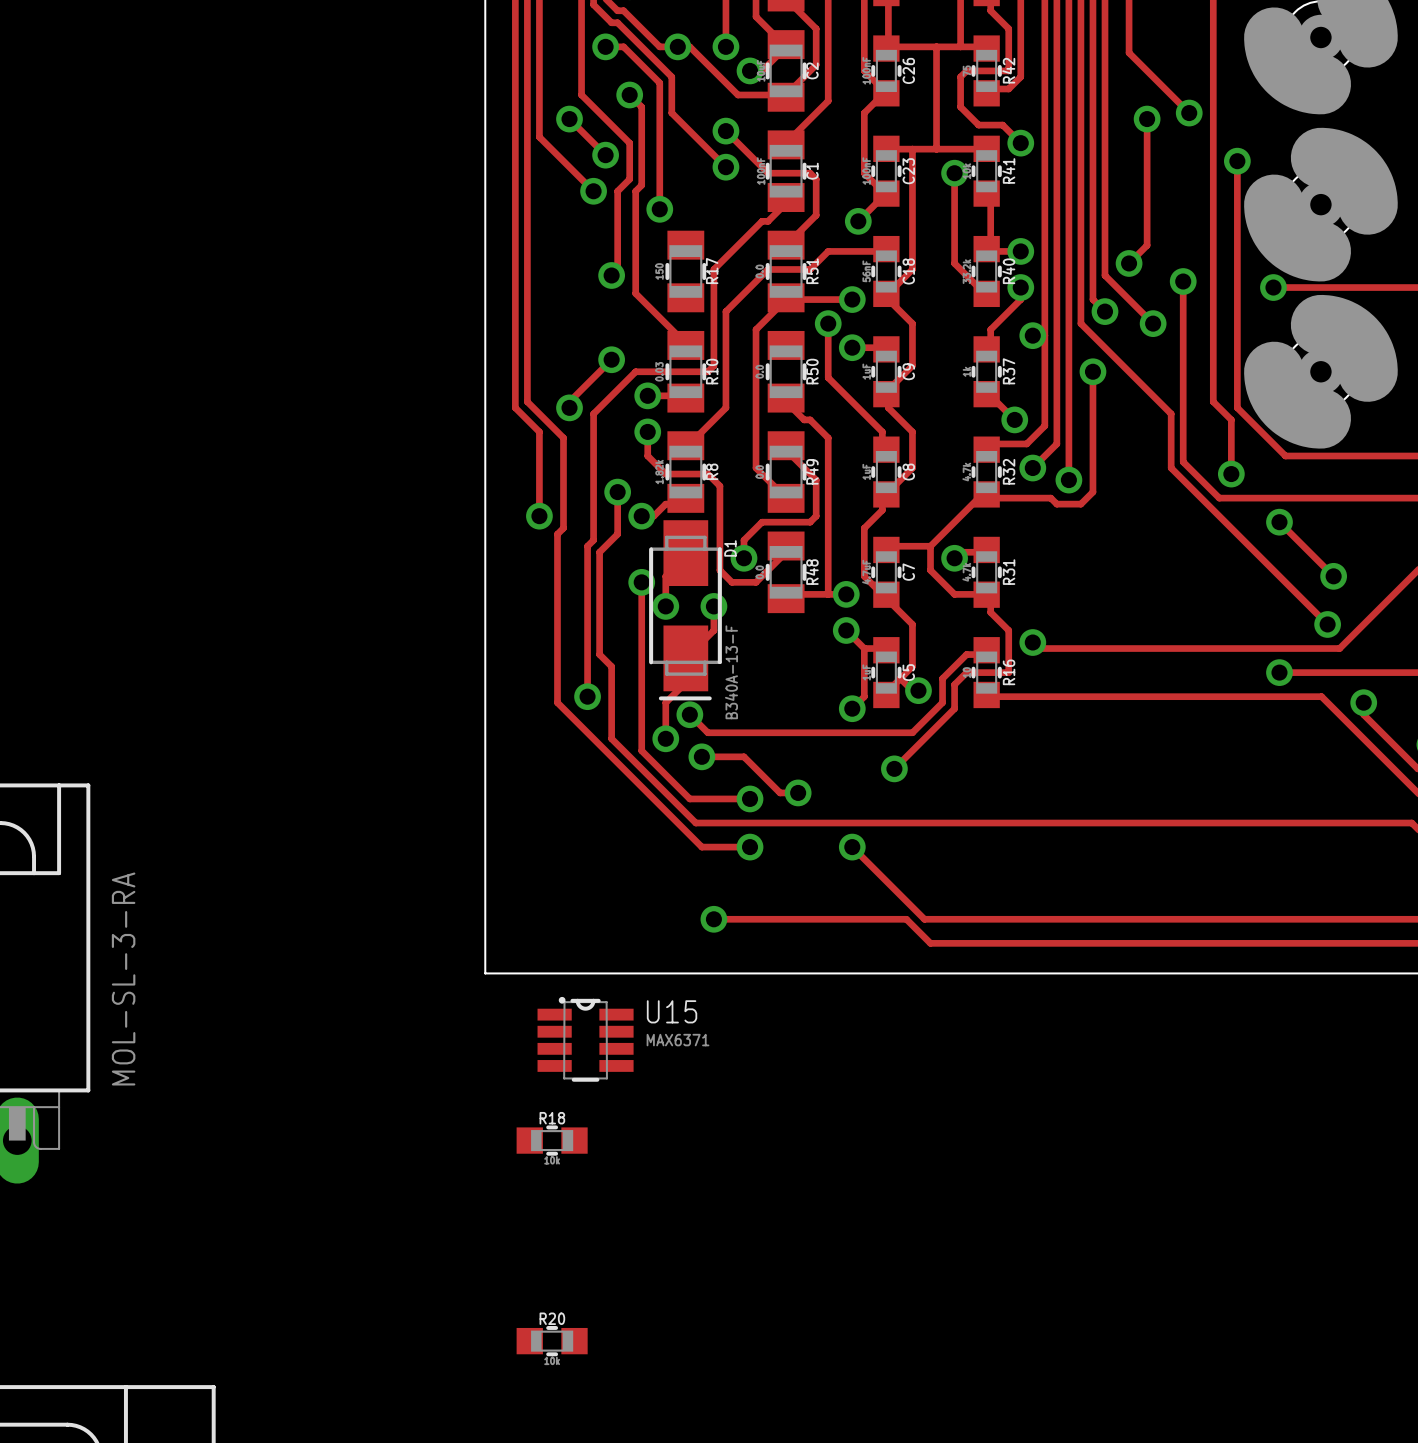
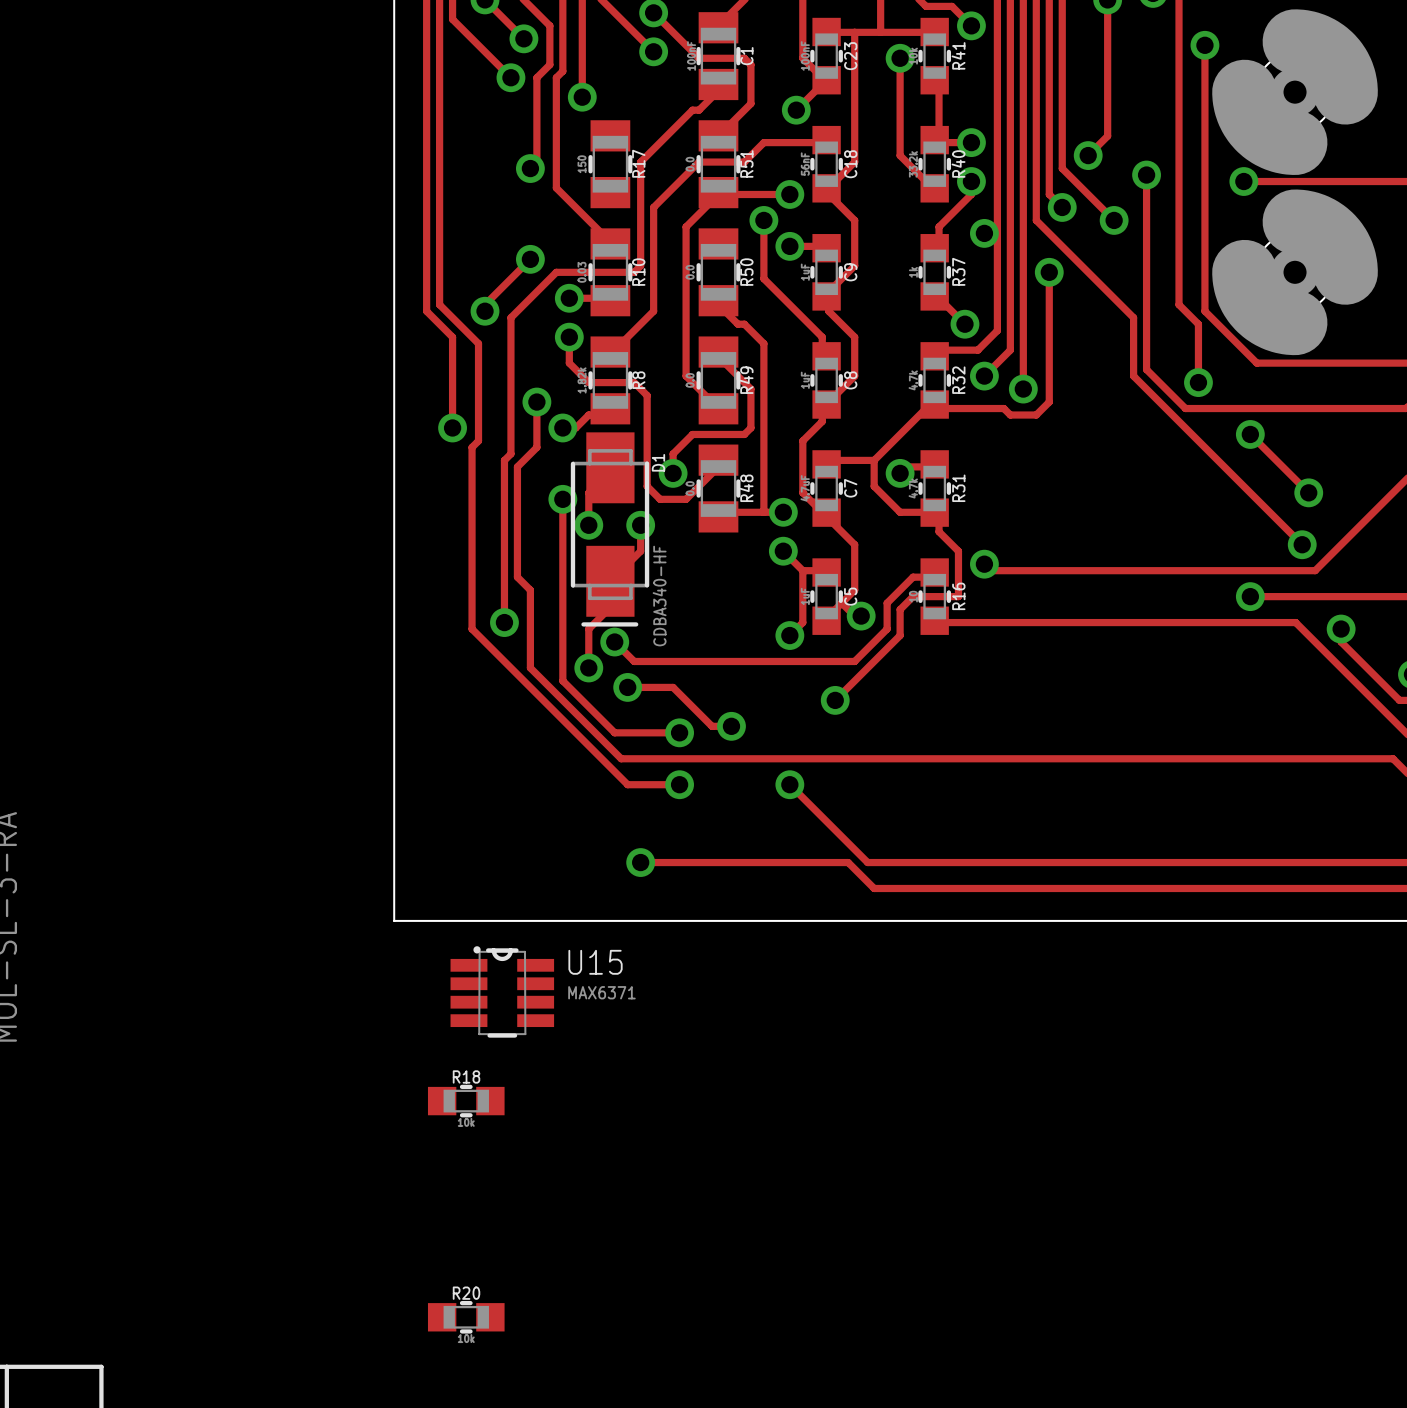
D1 value: B340A-13-F (731, 672) -> CDBA340-HF (659, 596)

